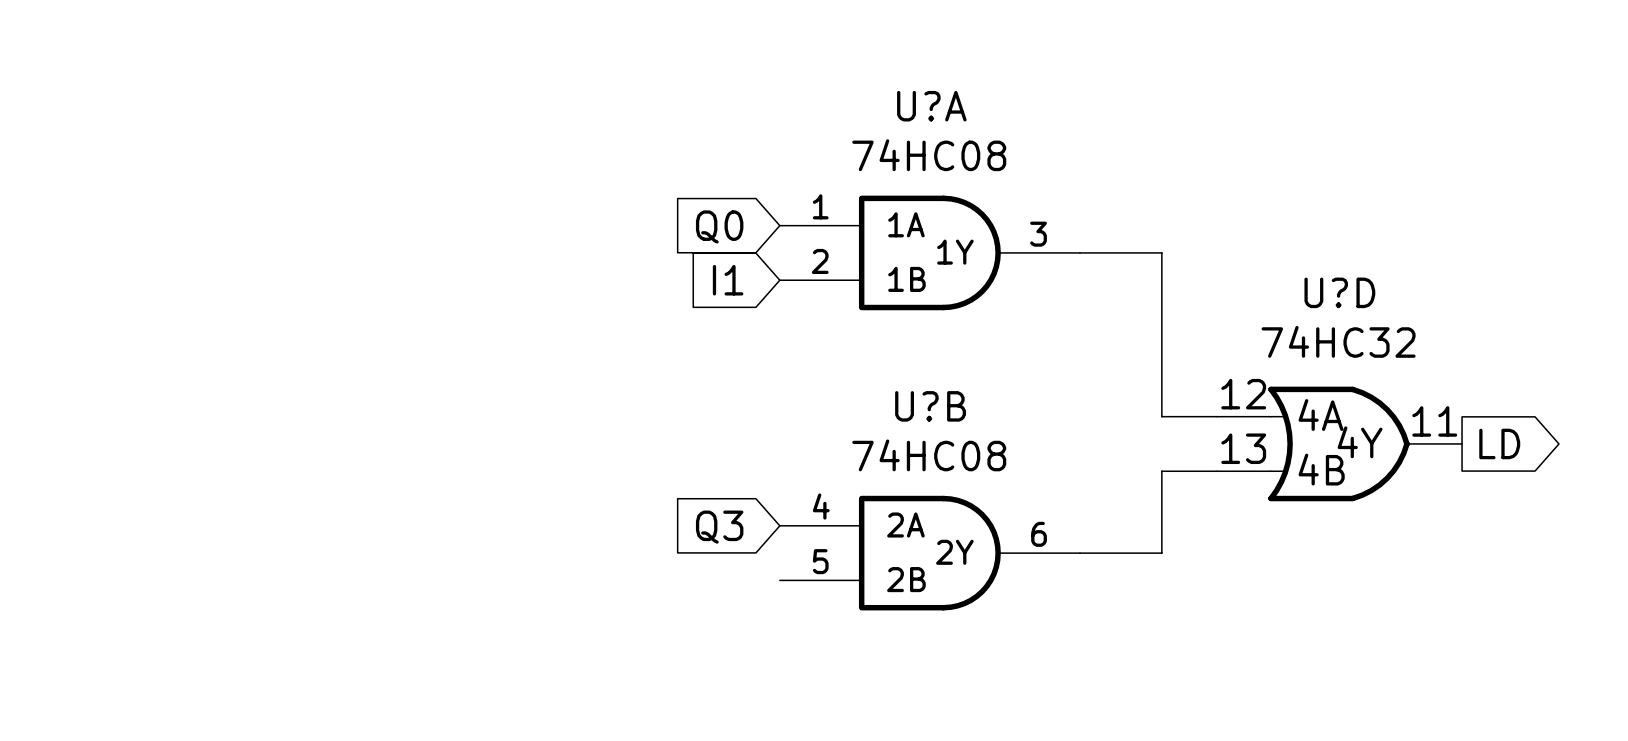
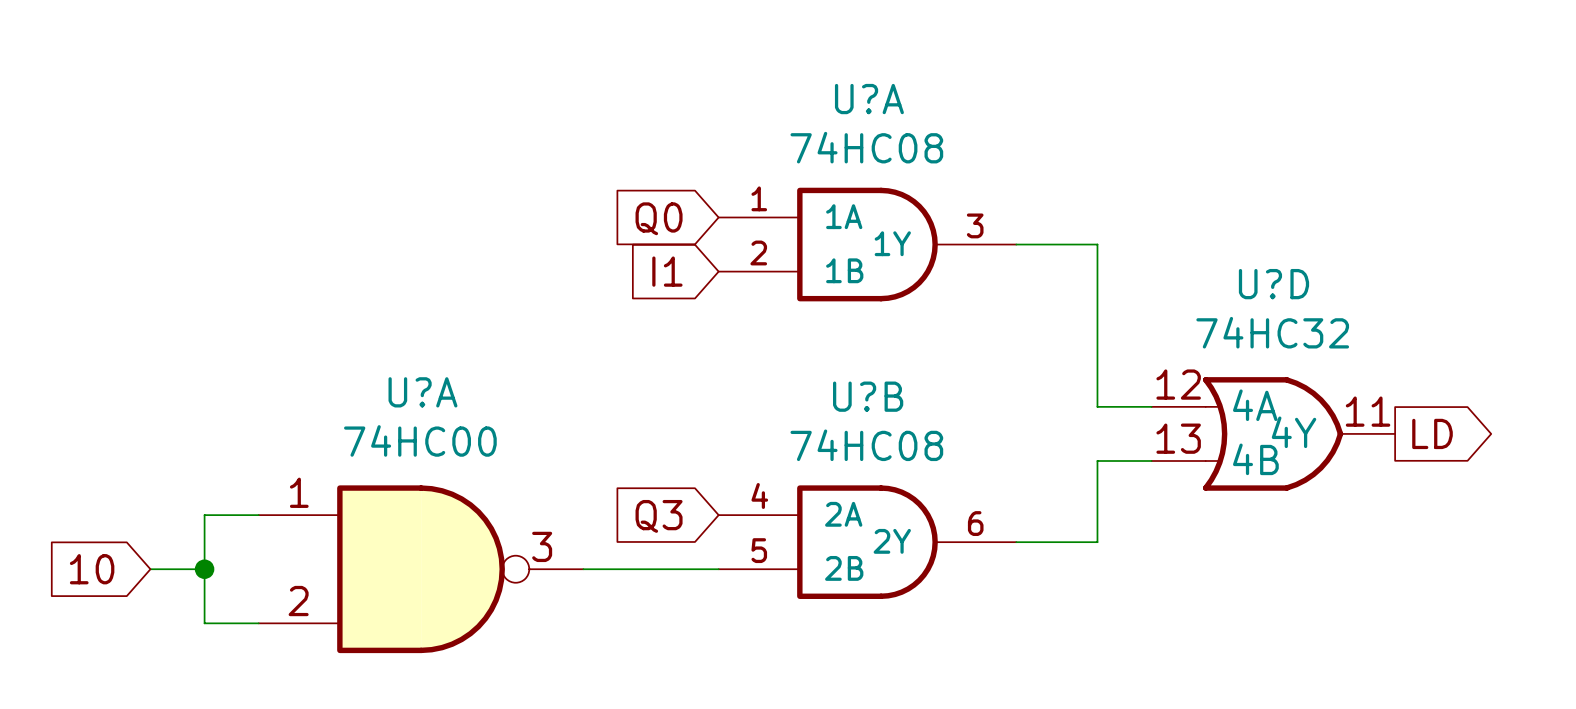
wire: none -> (258, 515) (204, 515) (204, 623) (258, 623)
global label: none -> 10 (92, 569)
wire: none -> (150, 569) (204, 569)
junction: none -> (204, 569)
U?A: none -> 74HC00 (421, 569)
wire: none -> (583, 569) (718, 569)

